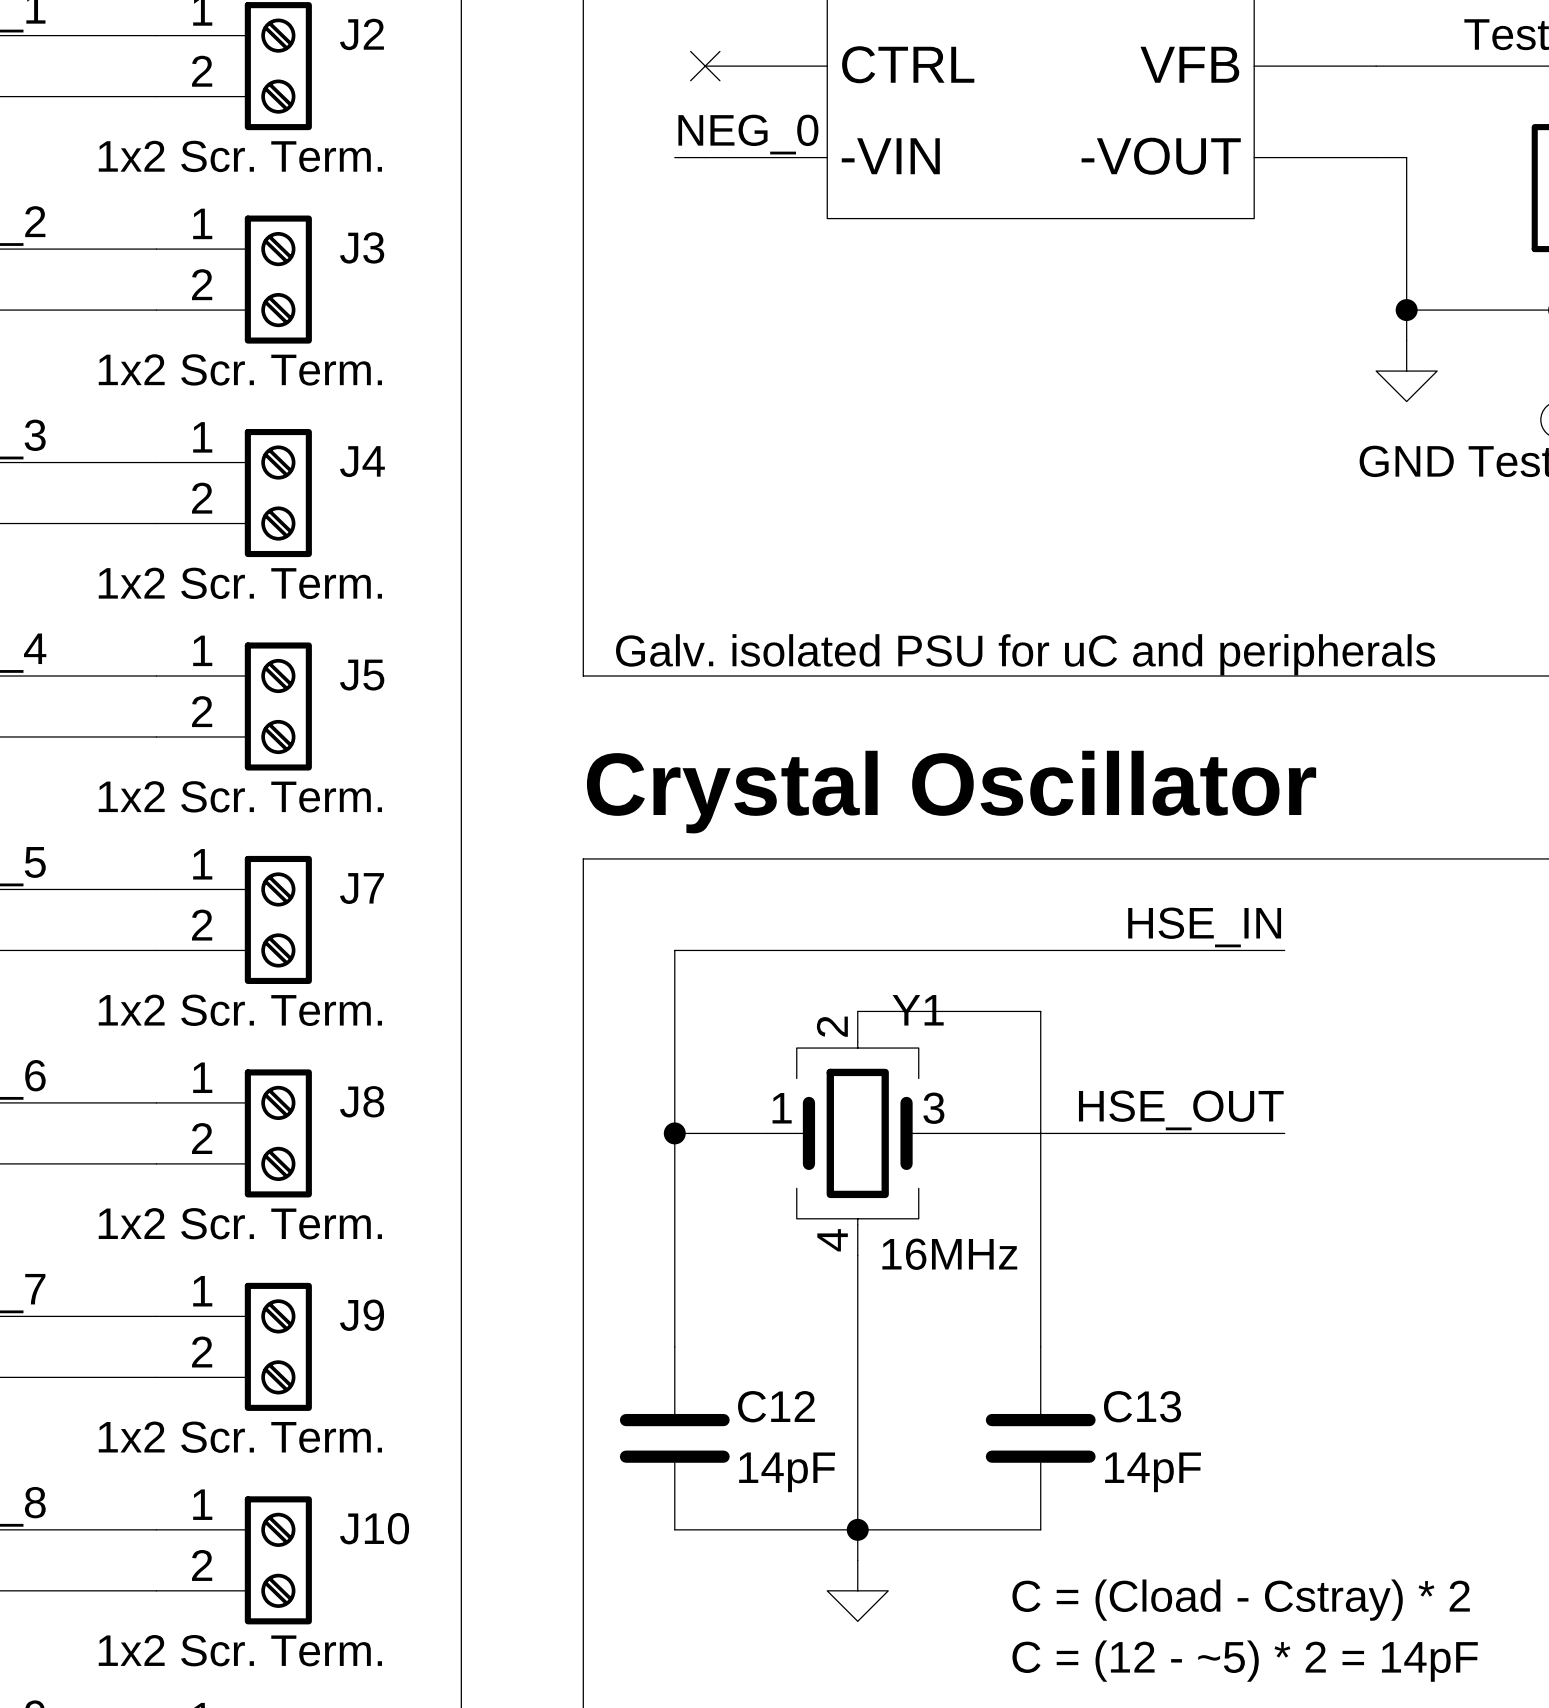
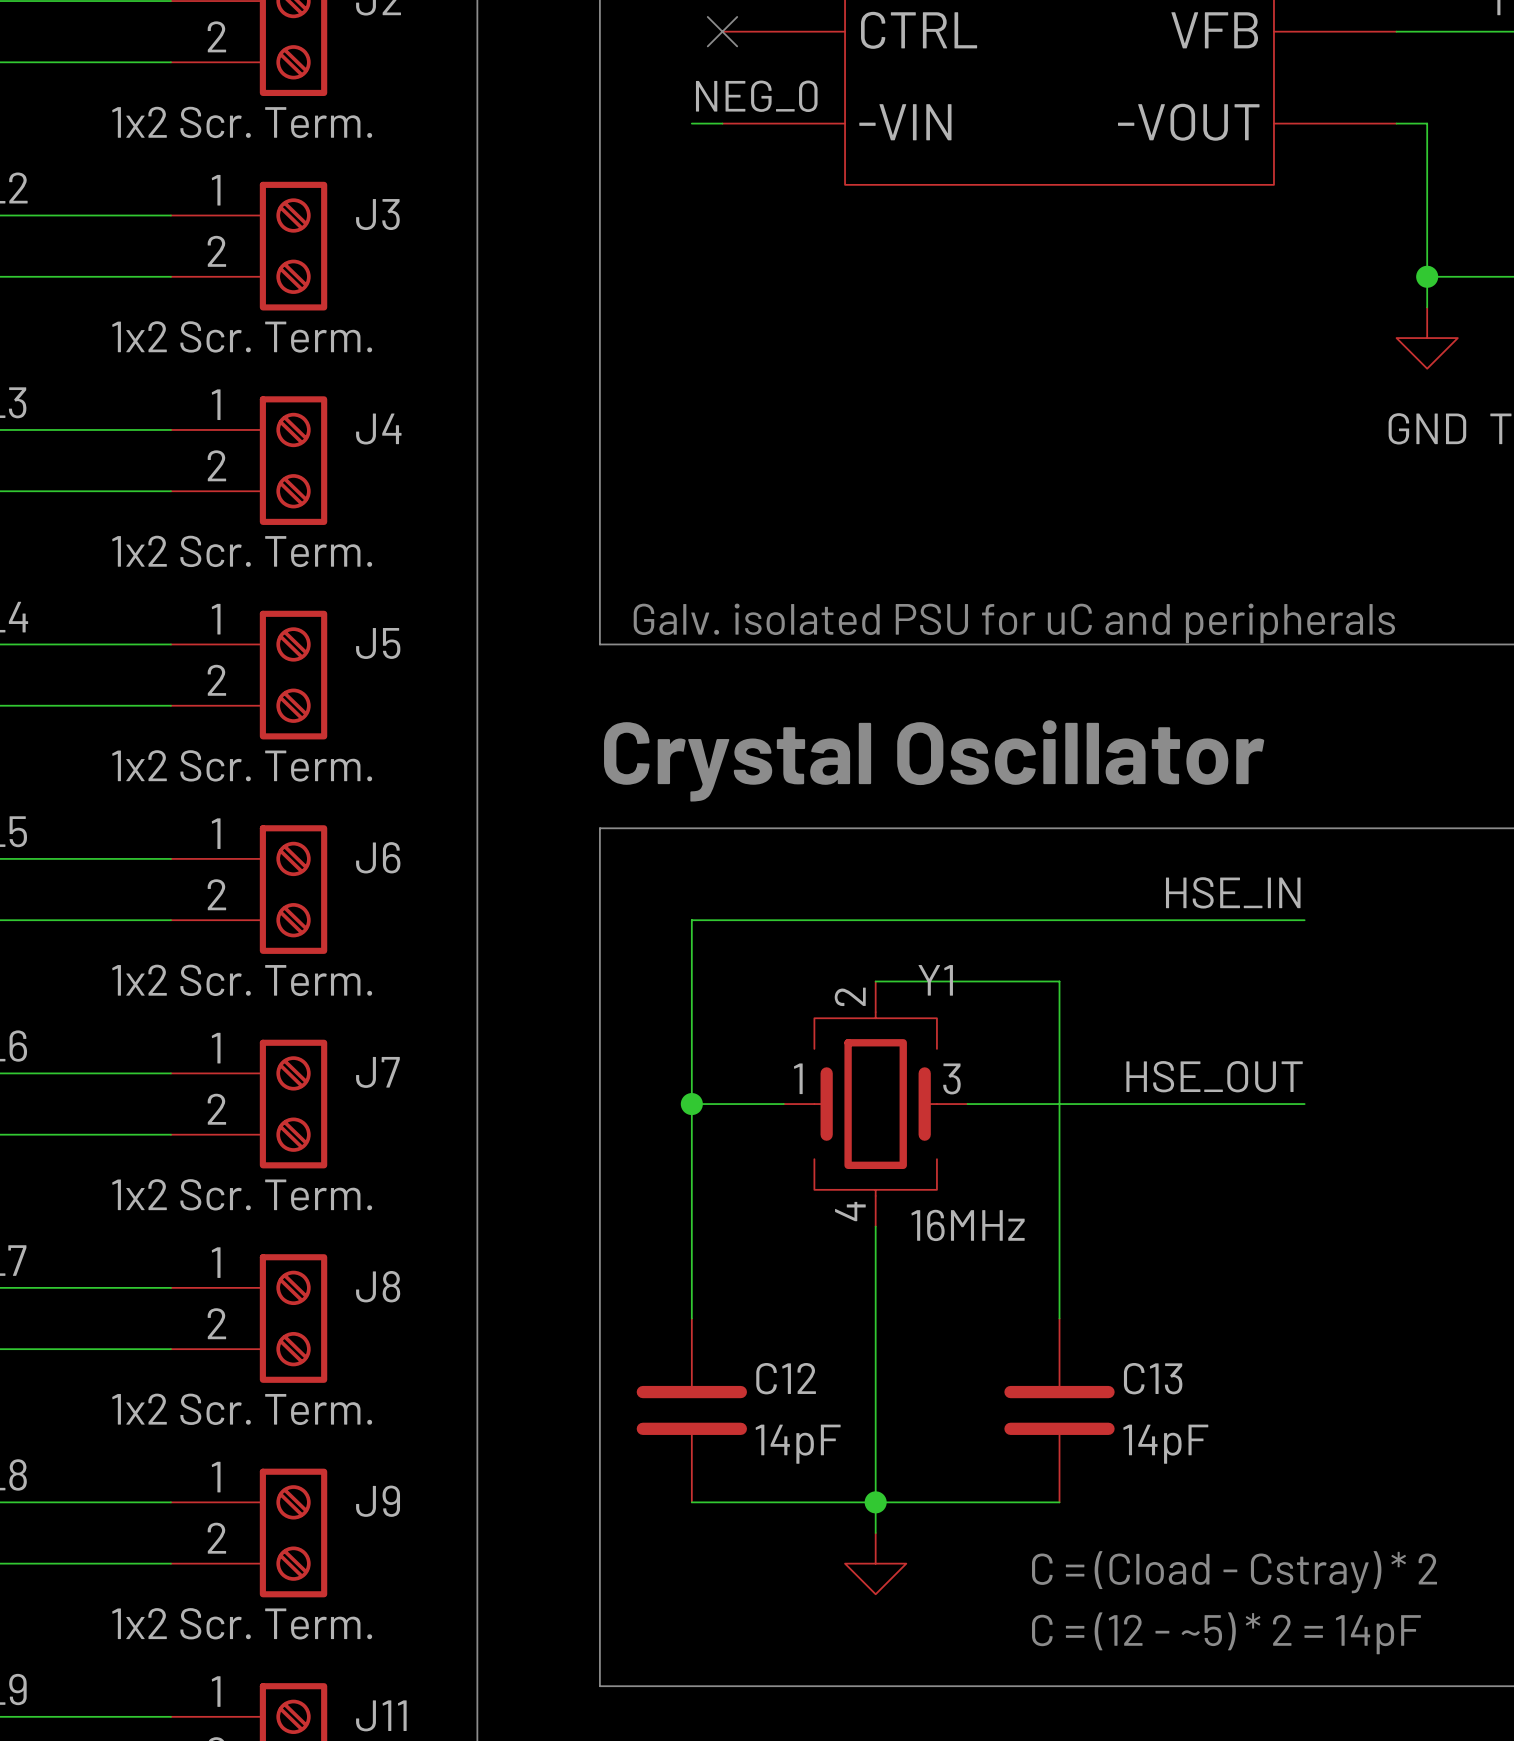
J7 name: J7 (361, 888) -> J6 (378, 857)
J8 name: J8 (362, 1101) -> J7 (377, 1072)
J9 name: J9 (362, 1315) -> J8 (378, 1286)
J10 name: J10 (374, 1528) -> J9 (378, 1501)

